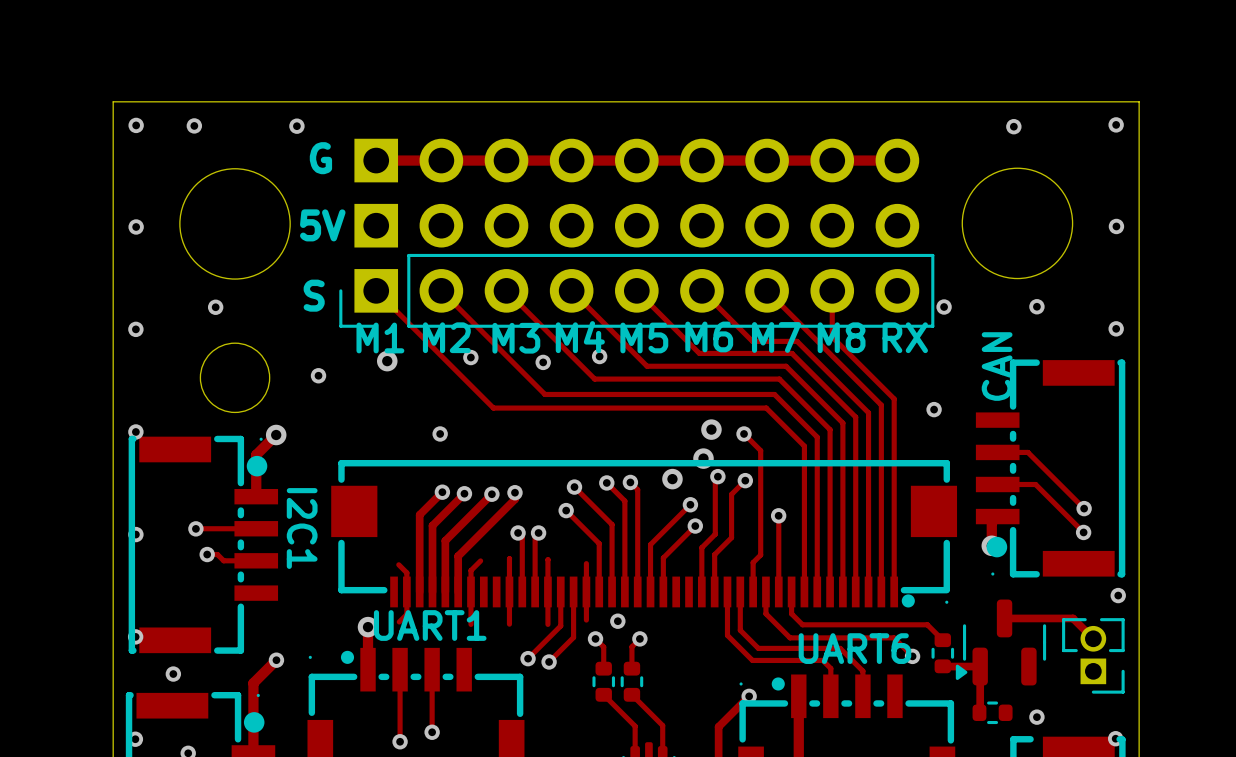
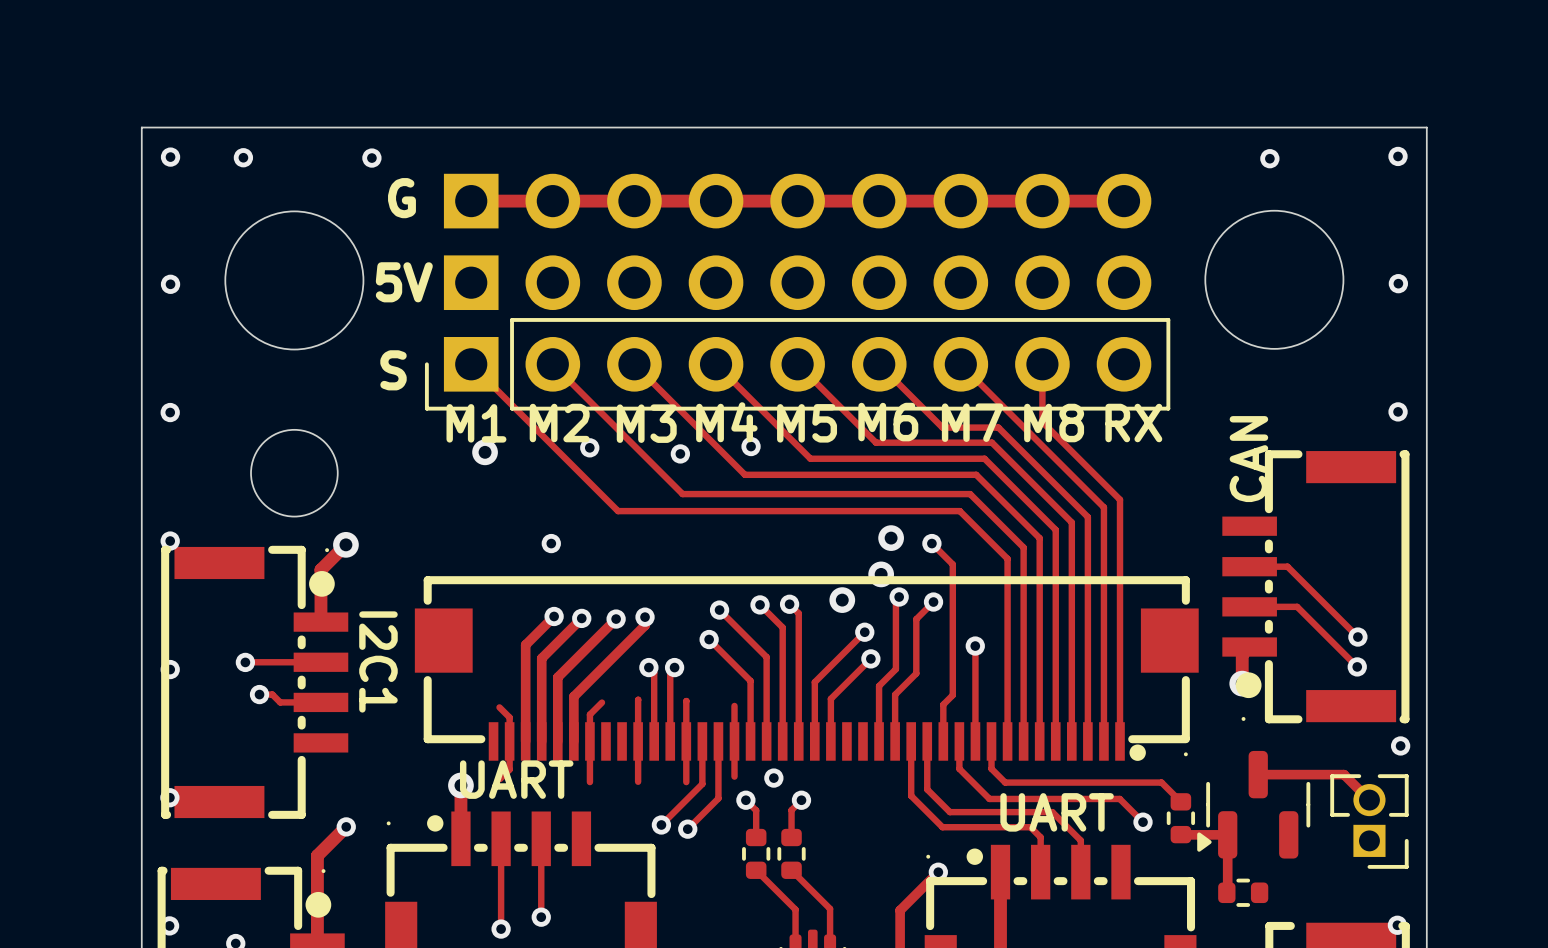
via: (1036, 306) -> none
via: (215, 307) -> none
via: (944, 307) -> none
via: (318, 375) -> none
via: (934, 409) -> none
text: UART1 (430, 625) -> UART (516, 779)
text: UART6 (854, 648) -> UART (1057, 812)
via: (173, 674) -> none
via: (1036, 717) -> none

